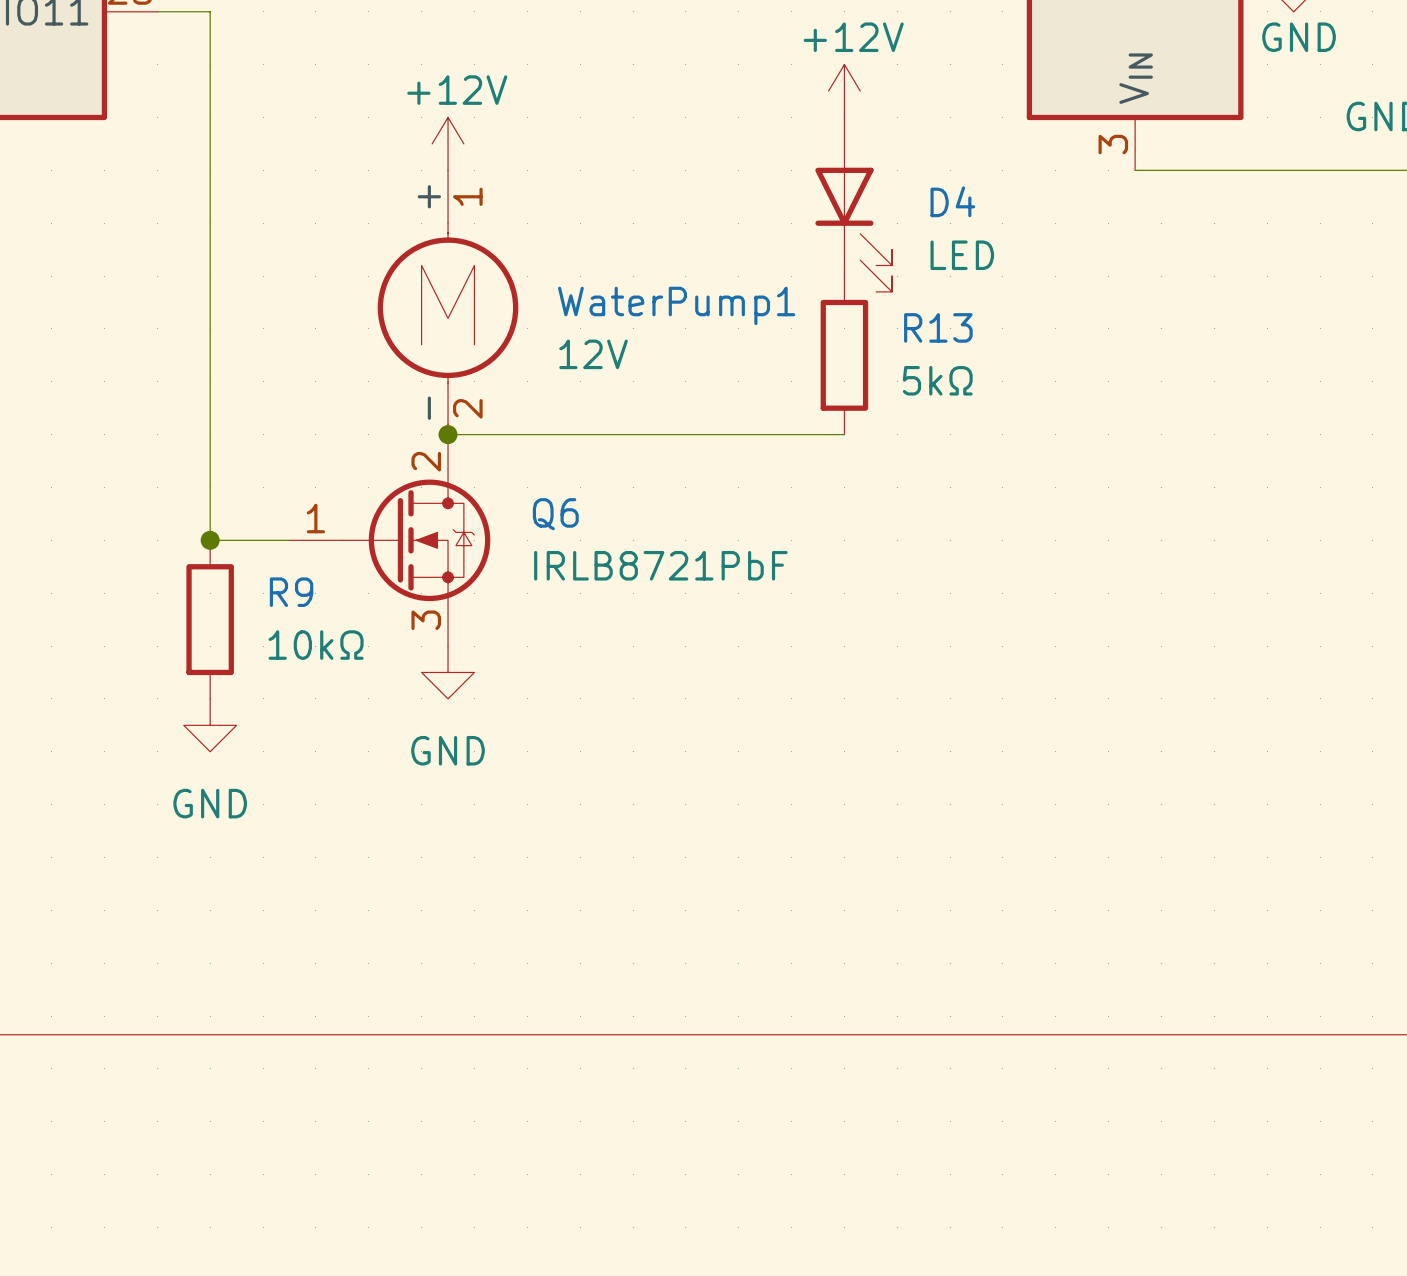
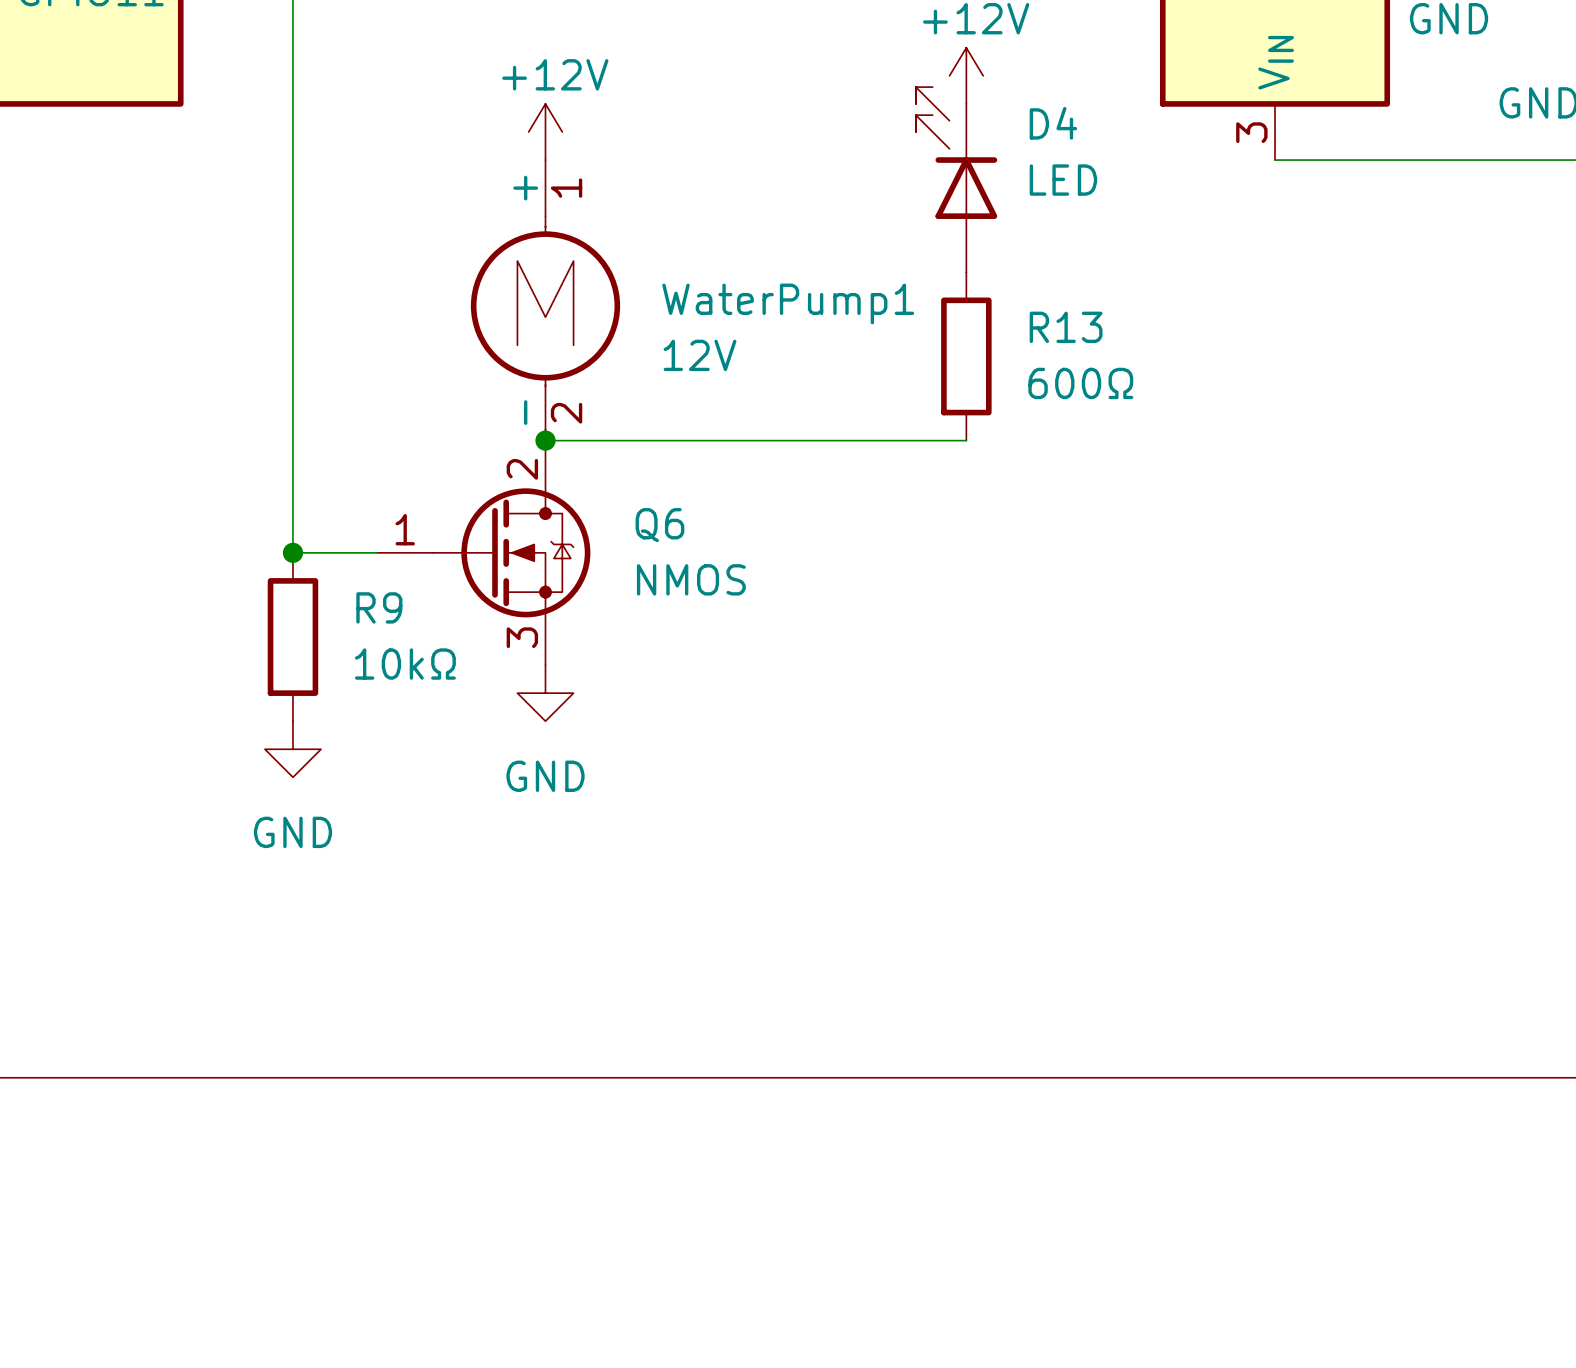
D4 name position: D4 (952, 201) -> D4 (1053, 123)
D4 rotation: 0° (853, 229) -> 180° (956, 153)
D4 value position: LED (962, 255) -> LED (1063, 180)
R13 value: 5kΩ (937, 380) -> 600Ω (1080, 383)
Q6 value: IRLB8721PbF (660, 565) -> NMOS (691, 579)

